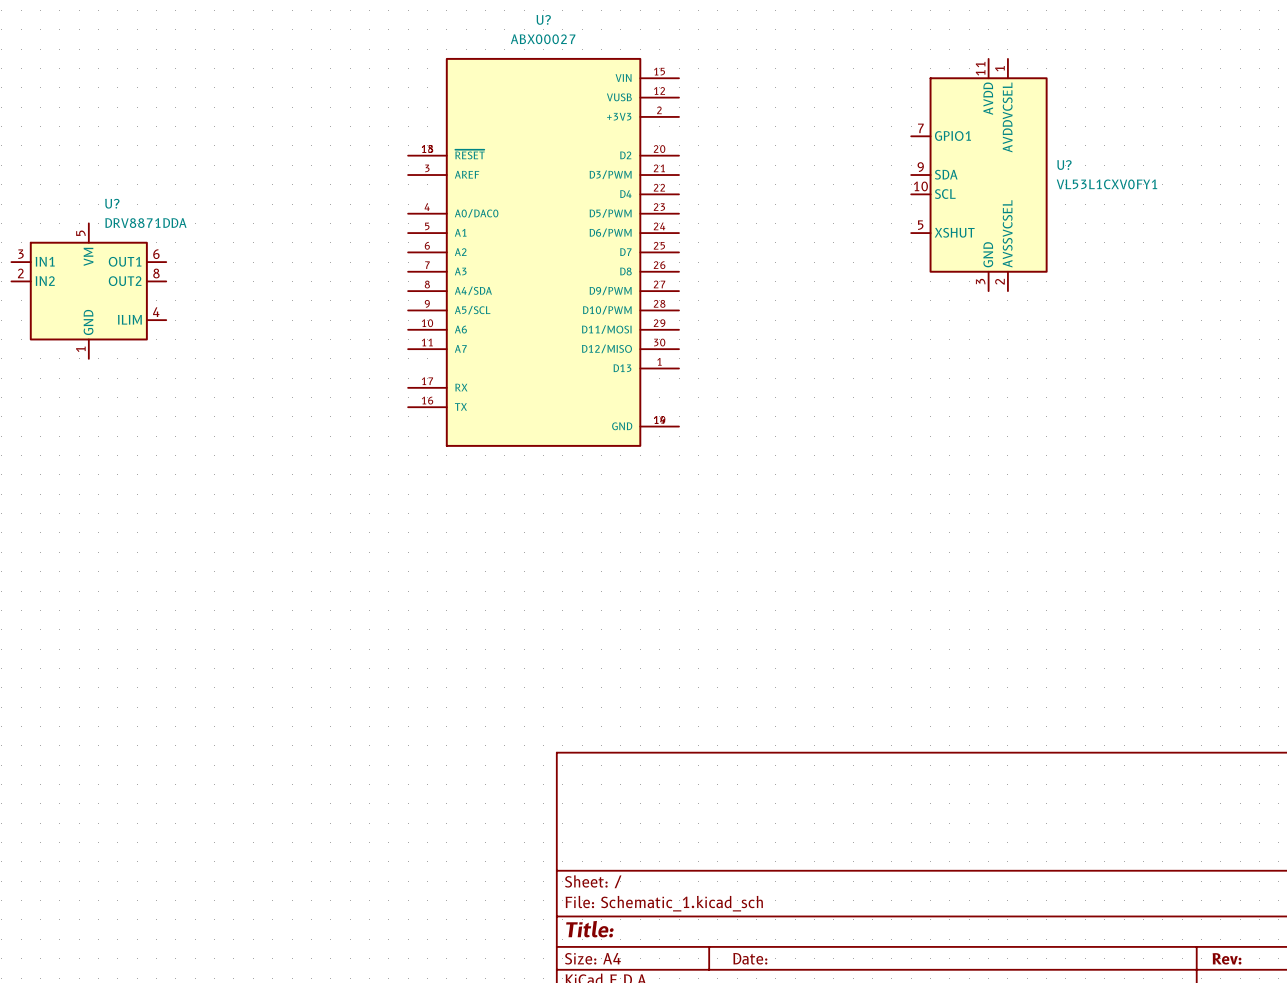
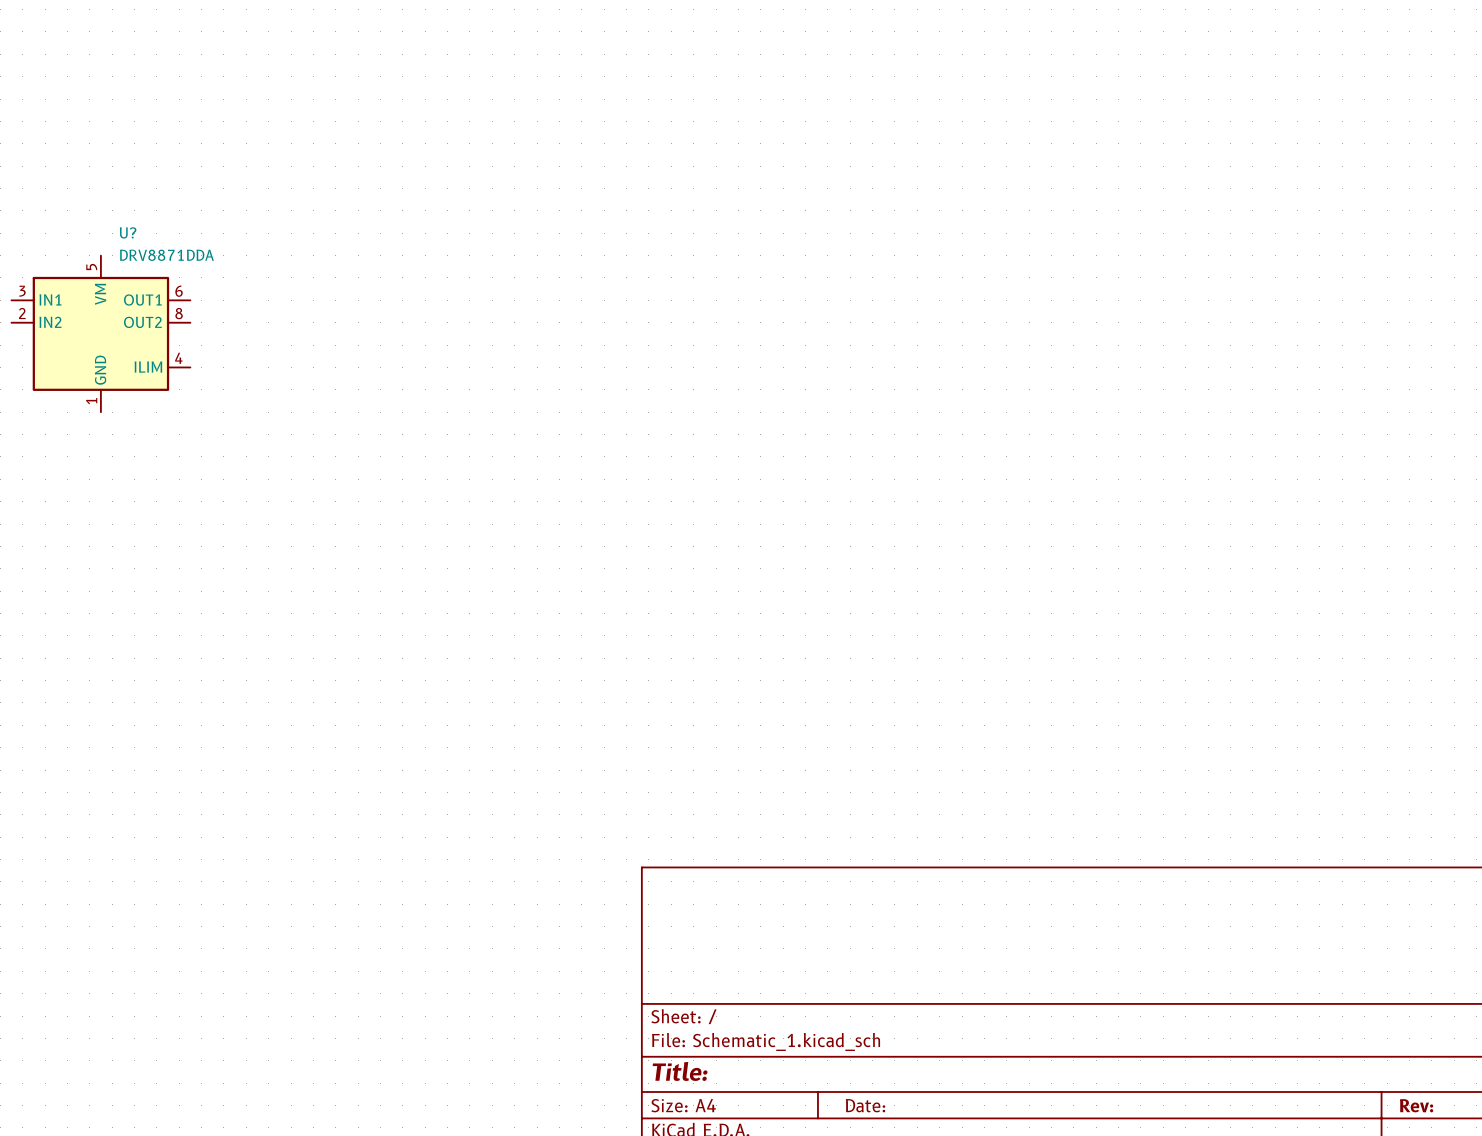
U?: VL53L1CXV0FY1 (979, 175) -> none
U?: ABX00027 (543, 252) -> none

